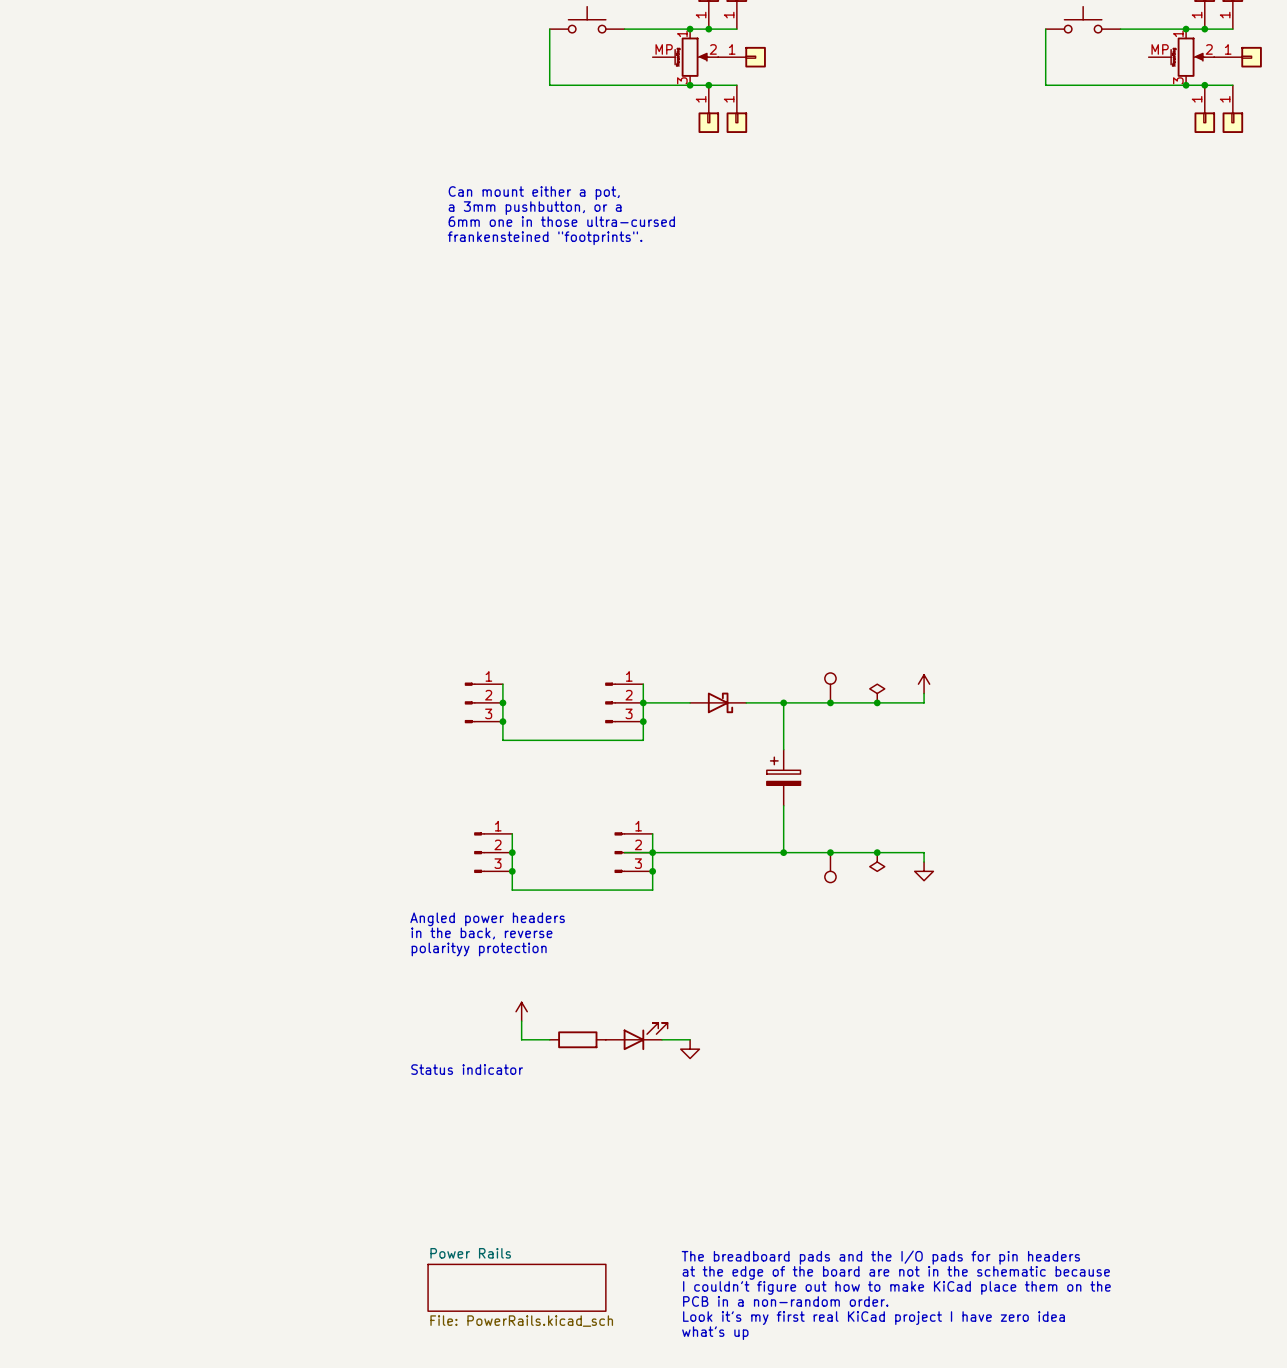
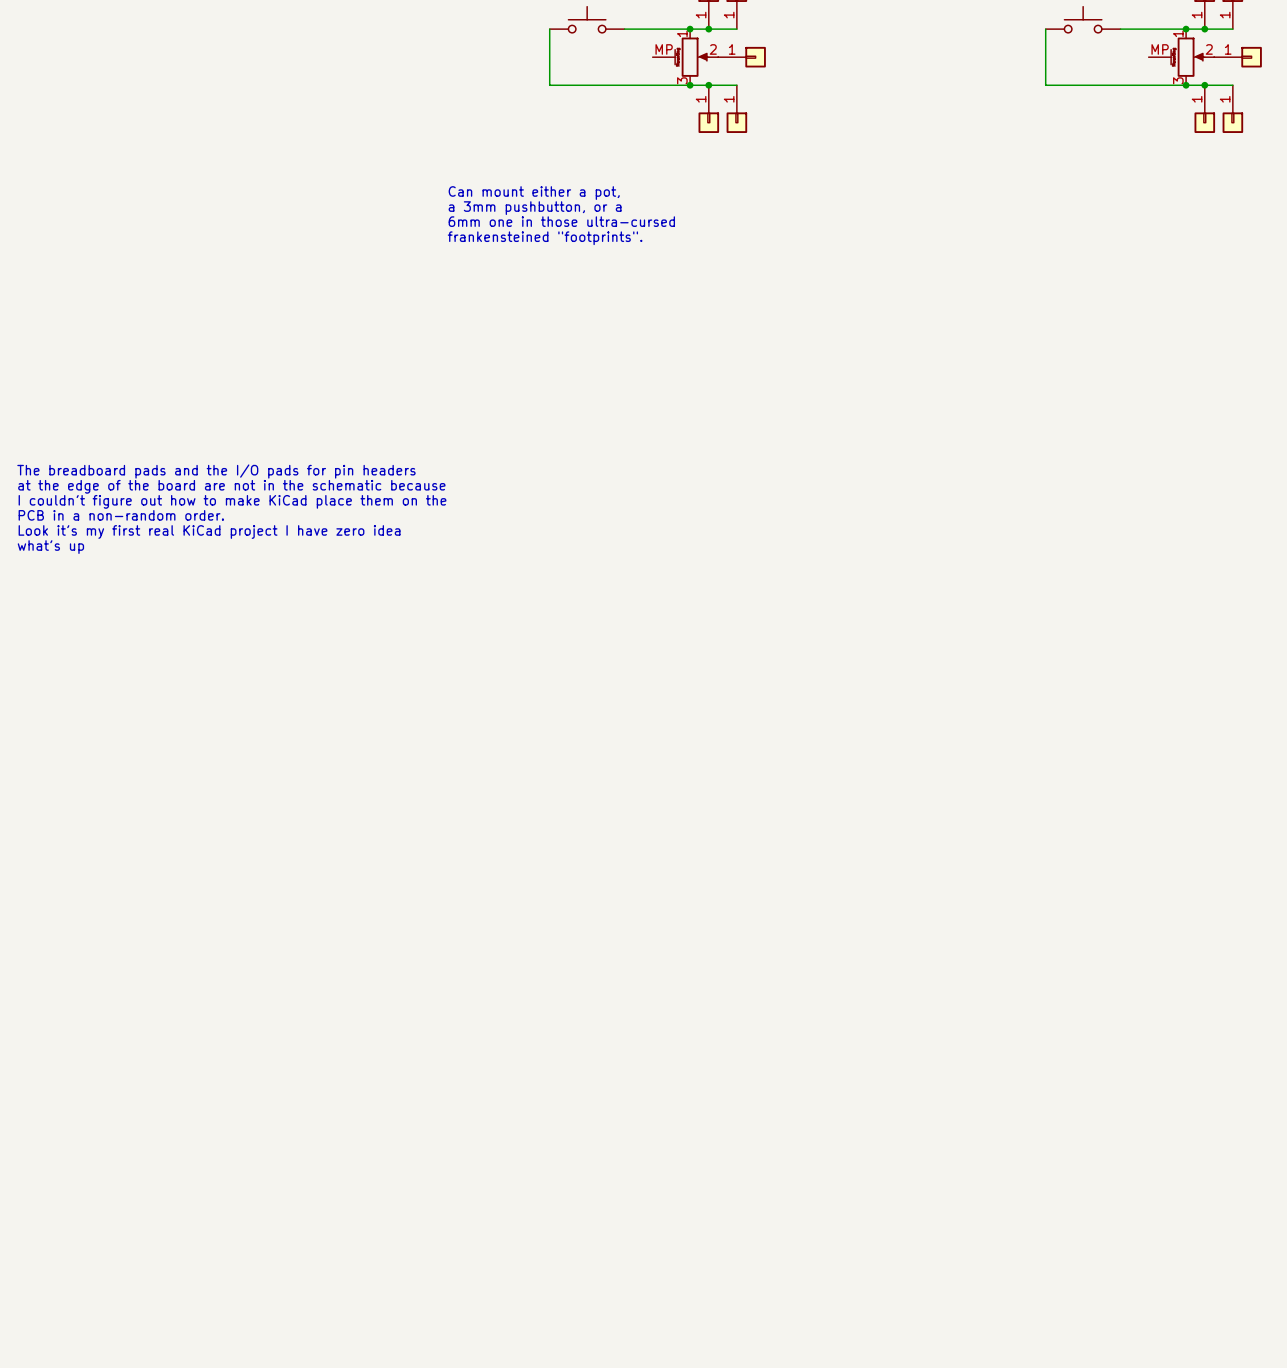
text: none -> The breadboard pads and the I/O pads for pin headers (216, 471)
text: none -> at the edge of the board are not in the schematic because (231, 486)
text: none -> I couldn't figure out how to make KiCad place them on the (232, 501)
text: none -> PCB in a non-random order. (121, 515)
text: none -> Look it's my first real KiCad project I have zero idea (209, 532)
text: none -> what's up (50, 547)
wire: (502, 684) (502, 740) (643, 740) (643, 684) -> none
power symbol: (924, 684) -> none
part: (830, 687) -> none
power symbol: (877, 693) -> none
wire: (924, 693) (924, 702) (746, 702) -> none
part: (483, 702) -> none
junction: (502, 702) -> none
part: (624, 702) -> none
wire: (643, 702) (690, 702) -> none
junction: (643, 702) -> none
part: (718, 702) -> none
wire: (783, 702) (783, 749) -> none
junction: (783, 702) -> none
junction: (830, 702) -> none
junction: (877, 702) -> none
junction: (502, 721) -> none
junction: (643, 721) -> none
part: (783, 777) -> none
wire: (783, 805) (783, 852) -> none
wire: (512, 833) (512, 890) (652, 890) (652, 833) -> none
part: (493, 852) -> none
junction: (512, 852) -> none
wire: (624, 852) (924, 852) (924, 861) -> none
part: (633, 852) -> none
junction: (652, 852) -> none
junction: (783, 852) -> none
junction: (830, 852) -> none
junction: (877, 852) -> none
power symbol: (877, 861) -> none
part: (830, 867) -> none
junction: (512, 871) -> none
junction: (652, 871) -> none
power symbol: (924, 871) -> none
text: Angled power headers (487, 919) -> none
text: in the back, reverse (481, 933) -> none
text: polarityy protection (479, 949) -> none
power symbol: (521, 1011) -> none
wire: (521, 1021) (521, 1039) (549, 1039) -> none
part: (636, 1036) -> none
part: (577, 1039) -> none
wire: (662, 1039) (690, 1039) -> none
power symbol: (690, 1049) -> none
text: Status indicator (467, 1069) -> none
text: The breadboard pads and the I/O pads for pin headers (880, 1257) -> none
text: at the edge of the board are not in the schematic because (896, 1272) -> none
sheet Power Rails: File: PowerRails.kicad_sch (516, 1287) -> none
text: I couldn't figure out how to make KiCad place them on the (896, 1287) -> none
text: PCB in a non-random order. (785, 1301) -> none
text: Look it's my first real KiCad project I have zero idea (873, 1318) -> none
text: what's up (715, 1333) -> none

